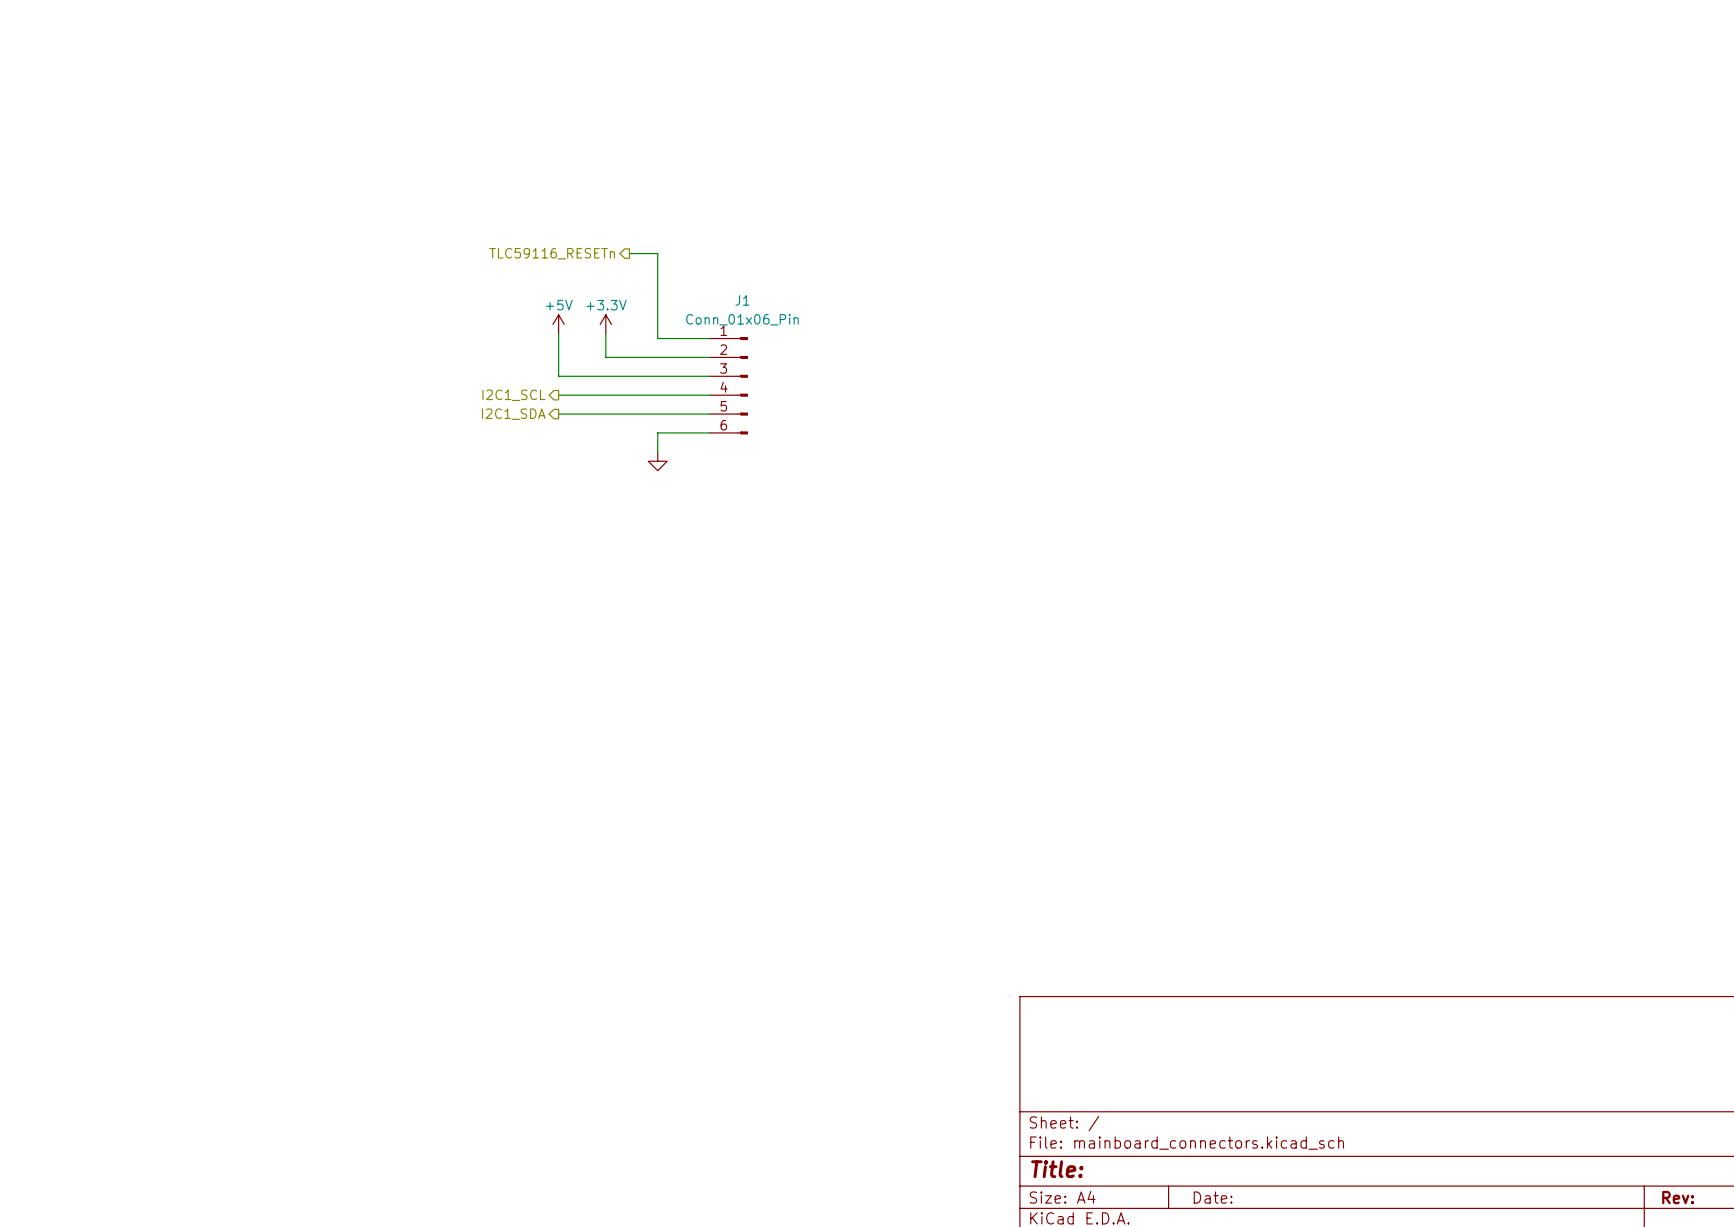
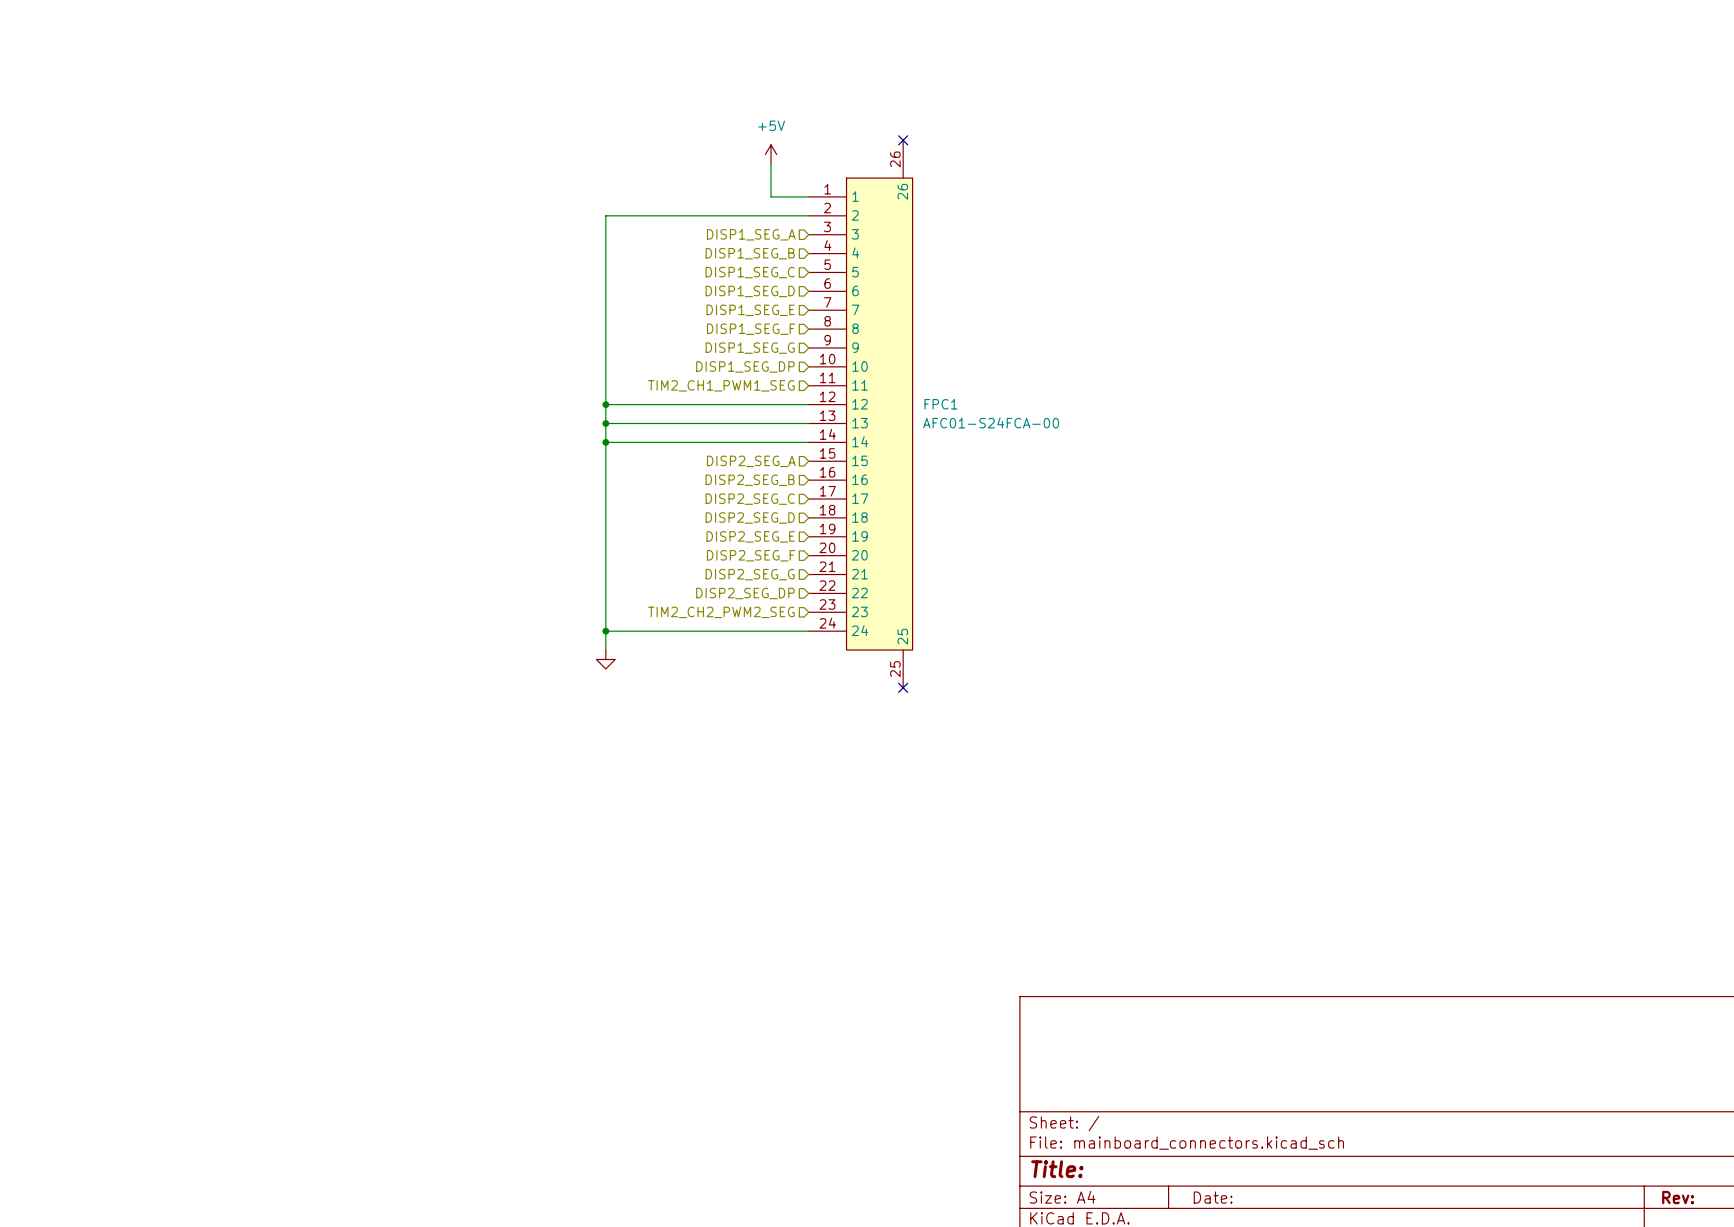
no-connect mark: none -> (903, 140)
power symbol: none -> +5V (771, 154)
wire: none -> (771, 163) (771, 196) (808, 196)
wire: none -> (808, 215) (605, 215) (605, 333)
hierarchical label: none -> DISP1_SEG_A (751, 234)
hierarchical label: TLC59116_RESETn (552, 253) -> none
wire: (629, 253) (657, 253) (657, 338) (709, 338) -> none
hierarchical label: none -> DISP1_SEG_B (750, 253)
hierarchical label: none -> DISP1_SEG_C (750, 272)
hierarchical label: none -> DISP1_SEG_D (750, 291)
hierarchical label: none -> DISP1_SEG_E (750, 310)
power symbol: +5V (558, 324) -> none
power symbol: +3.3V (605, 324) -> none
hierarchical label: none -> DISP1_SEG_F (751, 329)
wire: (558, 333) (558, 376) (709, 376) -> none
hierarchical label: none -> DISP1_SEG_G (750, 348)
wire: (605, 357) (709, 357) -> (605, 357) (605, 650)
hierarchical label: none -> DISP1_SEG_DP (745, 366)
hierarchical label: none -> TIM2_CH1_PWM1_SEG (721, 385)
J1: Conn_01x06_Pin (728, 385) -> none
hierarchical label: I2C1_SCL (513, 395) -> none
wire: (558, 395) (709, 395) -> none
wire: none -> (605, 404) (808, 404)
junction: none -> (605, 404)
hierarchical label: I2C1_SDA (513, 414) -> none
wire: (558, 414) (709, 414) -> none
FPC1: none -> AFC01-S24FCA-00 (860, 414)
wire: none -> (605, 423) (808, 423)
junction: none -> (605, 423)
wire: (709, 432) (657, 432) (657, 451) -> none
wire: none -> (605, 442) (808, 442)
junction: none -> (605, 442)
power symbol: (657, 461) -> none
hierarchical label: none -> DISP2_SEG_A (751, 461)
hierarchical label: none -> DISP2_SEG_B (750, 480)
hierarchical label: none -> DISP2_SEG_C (750, 499)
hierarchical label: none -> DISP2_SEG_D (750, 517)
hierarchical label: none -> DISP2_SEG_E (750, 536)
hierarchical label: none -> DISP2_SEG_F (751, 555)
hierarchical label: none -> DISP2_SEG_G (750, 574)
hierarchical label: none -> DISP2_SEG_DP (745, 593)
hierarchical label: none -> TIM2_CH2_PWM2_SEG (721, 612)
wire: none -> (605, 631) (808, 631)
junction: none -> (605, 631)
power symbol: none -> (605, 659)
no-connect mark: none -> (903, 687)

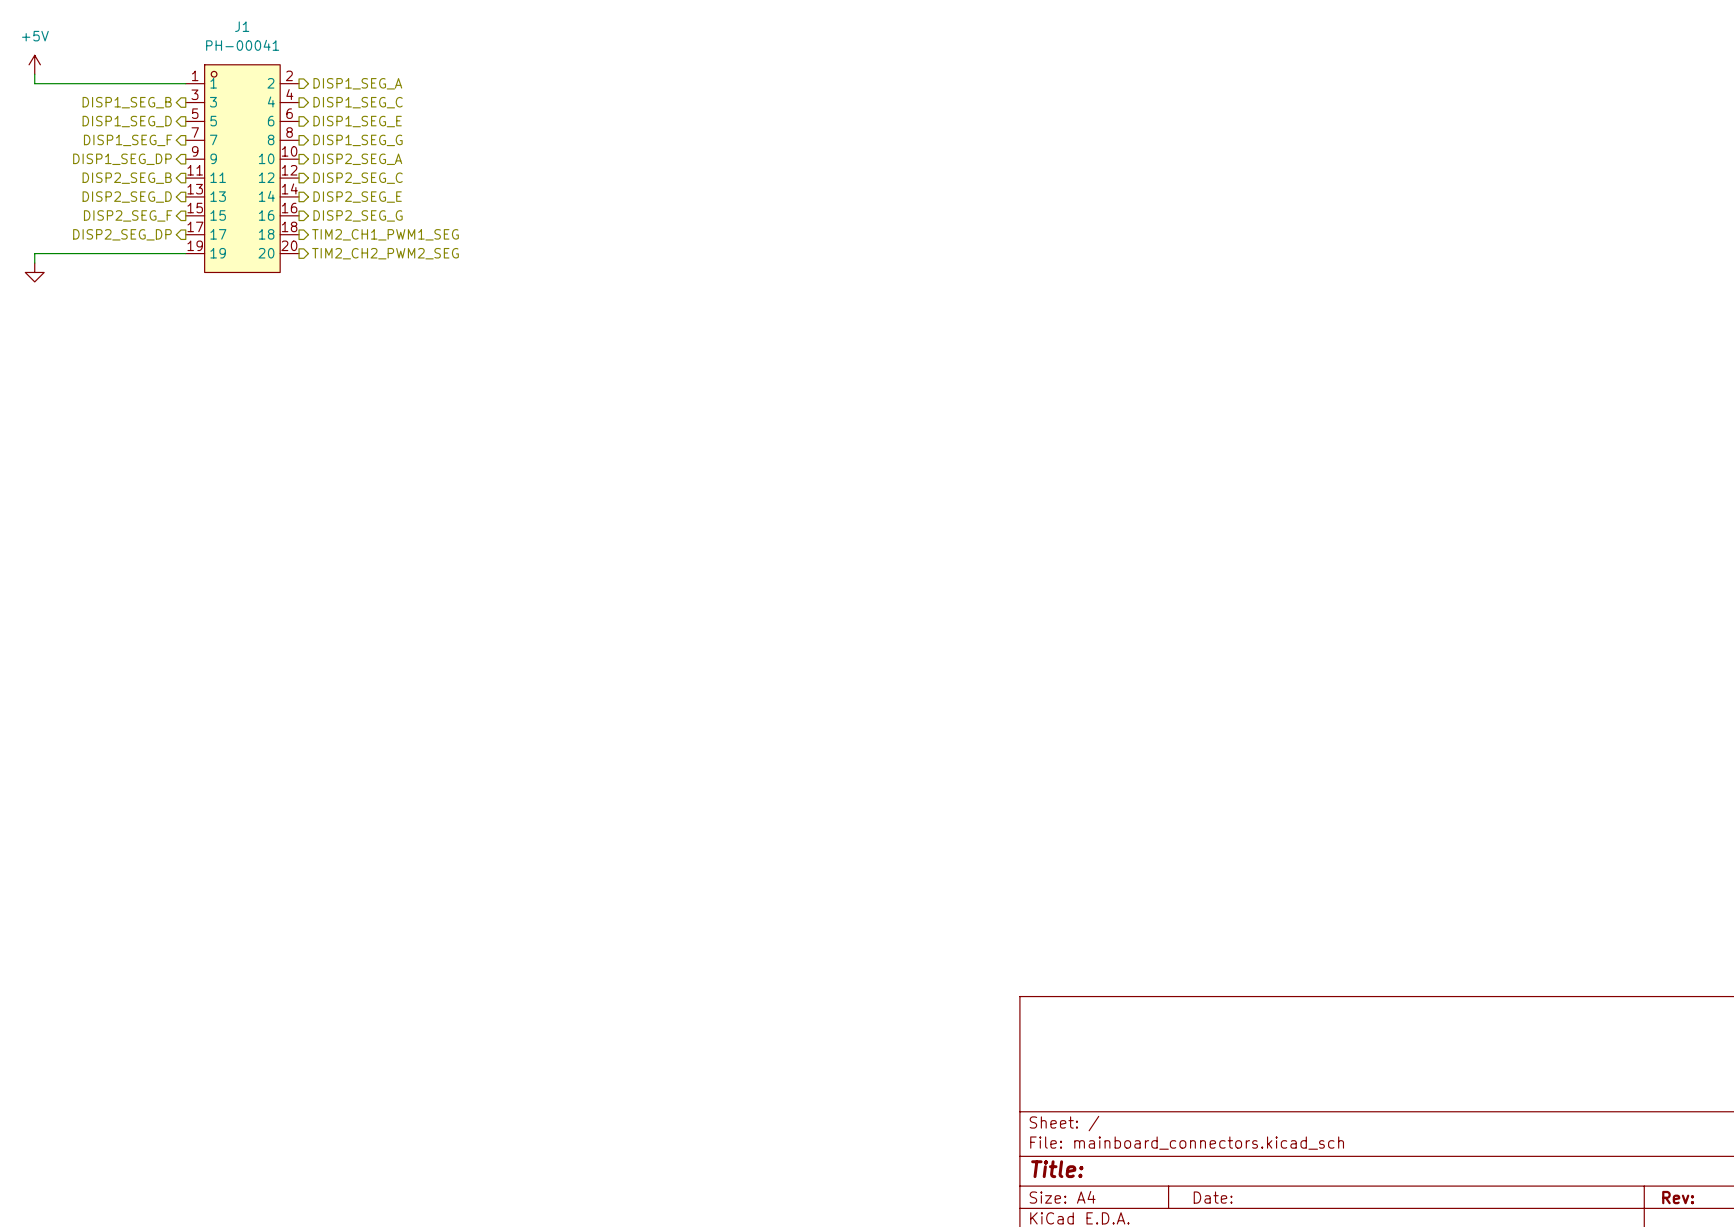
power symbol: none -> +5V (34, 64)
wire: none -> (34, 74) (34, 83) (185, 83)
hierarchical label: none -> DISP1_SEG_A (357, 83)
hierarchical label: none -> DISP1_SEG_B (127, 102)
hierarchical label: none -> DISP1_SEG_C (358, 102)
hierarchical label: none -> DISP1_SEG_D (127, 121)
hierarchical label: none -> DISP1_SEG_E (357, 121)
hierarchical label: none -> DISP1_SEG_F (128, 140)
hierarchical label: none -> DISP1_SEG_G (358, 140)
no-connect mark: (903, 140) -> none
power symbol: +5V (771, 154) -> none
hierarchical label: none -> DISP1_SEG_DP (122, 159)
hierarchical label: none -> DISP2_SEG_A (357, 159)
wire: (771, 163) (771, 196) (808, 196) -> none
J1: none -> PH-00041 (242, 168)
hierarchical label: none -> DISP2_SEG_B (127, 178)
hierarchical label: none -> DISP2_SEG_C (358, 178)
hierarchical label: none -> DISP2_SEG_D (127, 197)
hierarchical label: none -> DISP2_SEG_E (357, 197)
hierarchical label: none -> DISP2_SEG_F (128, 215)
hierarchical label: none -> DISP2_SEG_G (358, 215)
wire: (808, 215) (605, 215) (605, 650) -> none
hierarchical label: none -> DISP2_SEG_DP (122, 234)
hierarchical label: none -> TIM2_CH1_PWM1_SEG (385, 234)
hierarchical label: DISP1_SEG_A (751, 234) -> none
wire: none -> (185, 253) (34, 253) (34, 263)
hierarchical label: none -> TIM2_CH2_PWM2_SEG (385, 253)
hierarchical label: DISP1_SEG_B (750, 253) -> none
power symbol: none -> (34, 272)
hierarchical label: DISP1_SEG_C (750, 272) -> none
hierarchical label: DISP1_SEG_D (750, 291) -> none
hierarchical label: DISP1_SEG_E (750, 310) -> none
hierarchical label: DISP1_SEG_F (751, 329) -> none
hierarchical label: DISP1_SEG_G (750, 348) -> none
hierarchical label: DISP1_SEG_DP (745, 366) -> none
hierarchical label: TIM2_CH1_PWM1_SEG (721, 385) -> none
wire: (605, 404) (808, 404) -> none
junction: (605, 404) -> none
FPC1: AFC01-S24FCA-00 (860, 414) -> none
wire: (605, 423) (808, 423) -> none
junction: (605, 423) -> none
wire: (605, 442) (808, 442) -> none
junction: (605, 442) -> none
hierarchical label: DISP2_SEG_A (751, 461) -> none
hierarchical label: DISP2_SEG_B (750, 480) -> none
hierarchical label: DISP2_SEG_C (750, 499) -> none
hierarchical label: DISP2_SEG_D (750, 517) -> none
hierarchical label: DISP2_SEG_E (750, 536) -> none
hierarchical label: DISP2_SEG_F (751, 555) -> none
hierarchical label: DISP2_SEG_G (750, 574) -> none
hierarchical label: DISP2_SEG_DP (745, 593) -> none
hierarchical label: TIM2_CH2_PWM2_SEG (721, 612) -> none
wire: (605, 631) (808, 631) -> none
junction: (605, 631) -> none
power symbol: (605, 659) -> none
no-connect mark: (903, 687) -> none

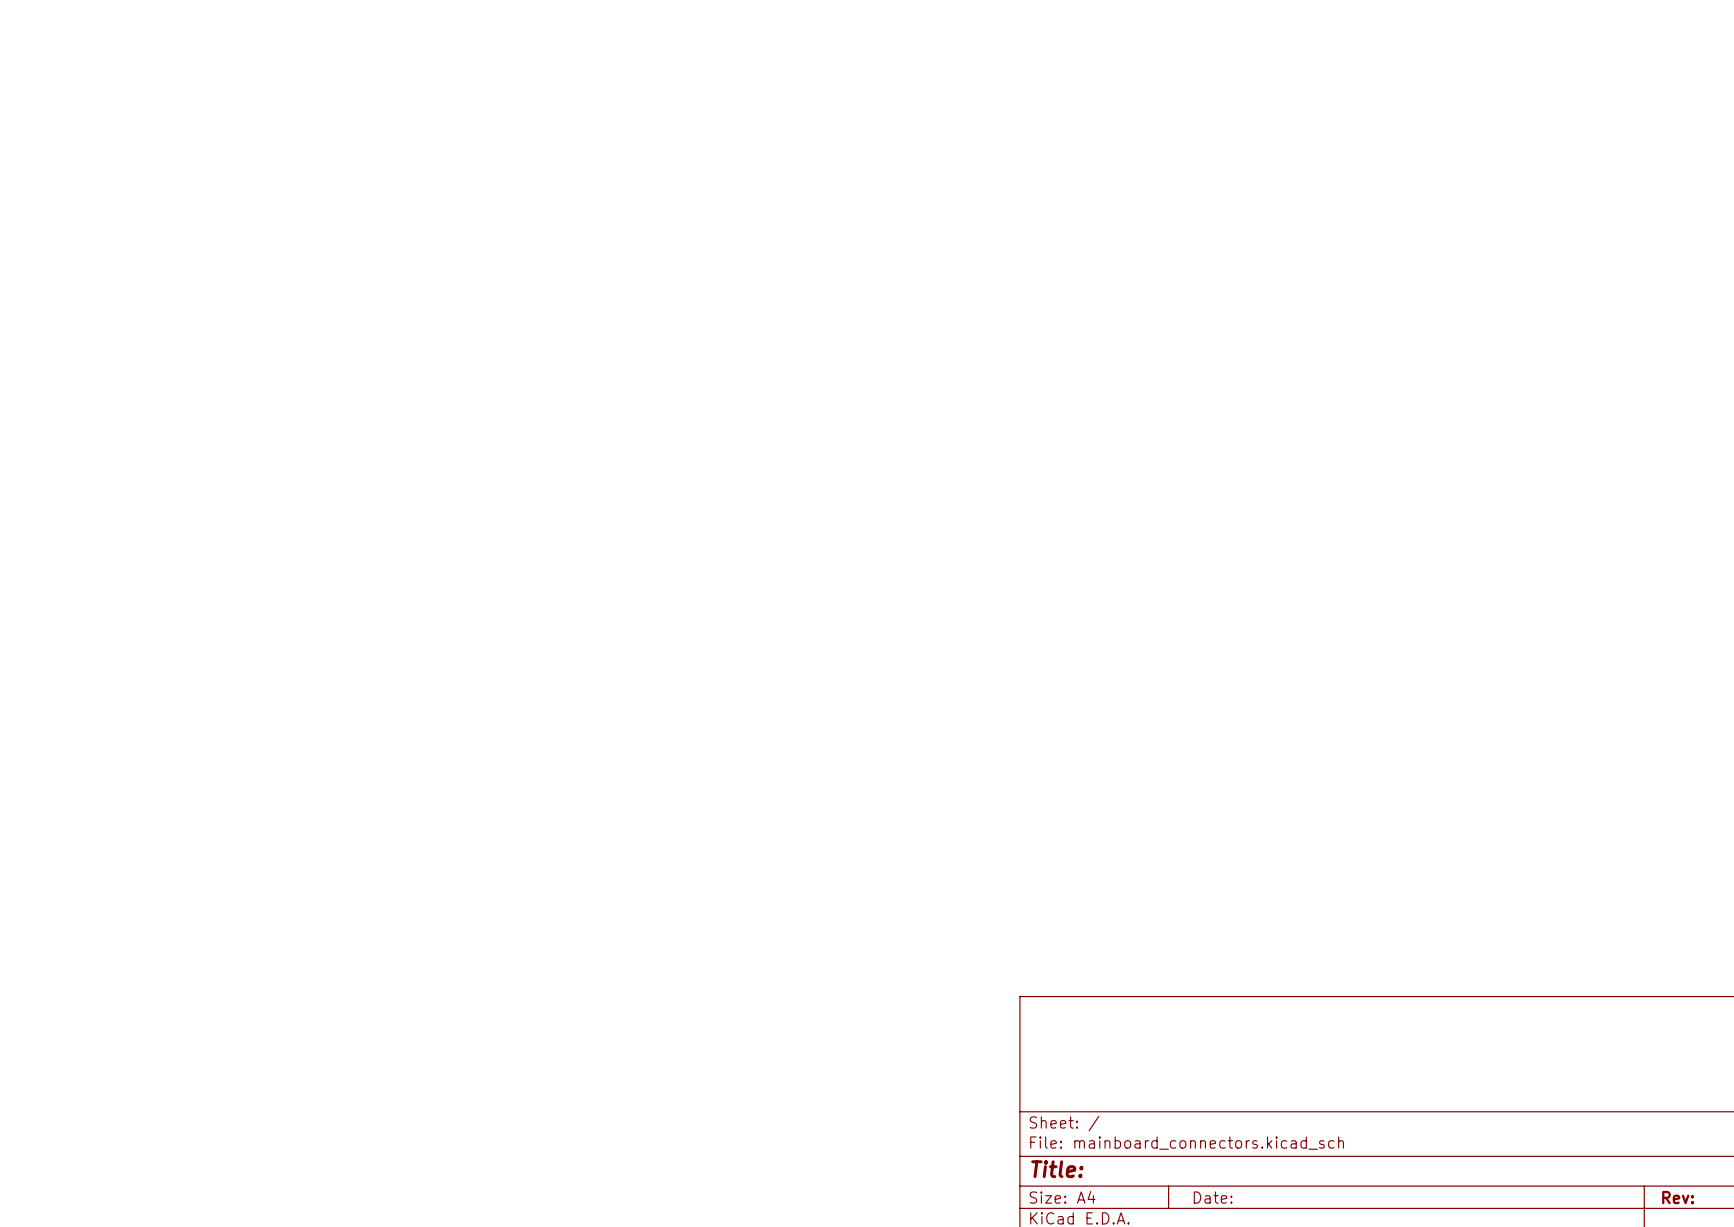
power symbol: +5V (34, 64) -> none
wire: (34, 74) (34, 83) (185, 83) -> none
hierarchical label: DISP1_SEG_A (357, 83) -> none
hierarchical label: DISP1_SEG_B (127, 102) -> none
hierarchical label: DISP1_SEG_C (358, 102) -> none
hierarchical label: DISP1_SEG_D (127, 121) -> none
hierarchical label: DISP1_SEG_E (357, 121) -> none
hierarchical label: DISP1_SEG_F (128, 140) -> none
hierarchical label: DISP1_SEG_G (358, 140) -> none
hierarchical label: DISP1_SEG_DP (122, 159) -> none
hierarchical label: DISP2_SEG_A (357, 159) -> none
J1: PH-00041 (242, 168) -> none
hierarchical label: DISP2_SEG_B (127, 178) -> none
hierarchical label: DISP2_SEG_C (358, 178) -> none
hierarchical label: DISP2_SEG_D (127, 197) -> none
hierarchical label: DISP2_SEG_E (357, 197) -> none
hierarchical label: DISP2_SEG_F (128, 215) -> none
hierarchical label: DISP2_SEG_G (358, 215) -> none
hierarchical label: DISP2_SEG_DP (122, 234) -> none
hierarchical label: TIM2_CH1_PWM1_SEG (385, 234) -> none
wire: (185, 253) (34, 253) (34, 263) -> none
hierarchical label: TIM2_CH2_PWM2_SEG (385, 253) -> none
power symbol: (34, 272) -> none

